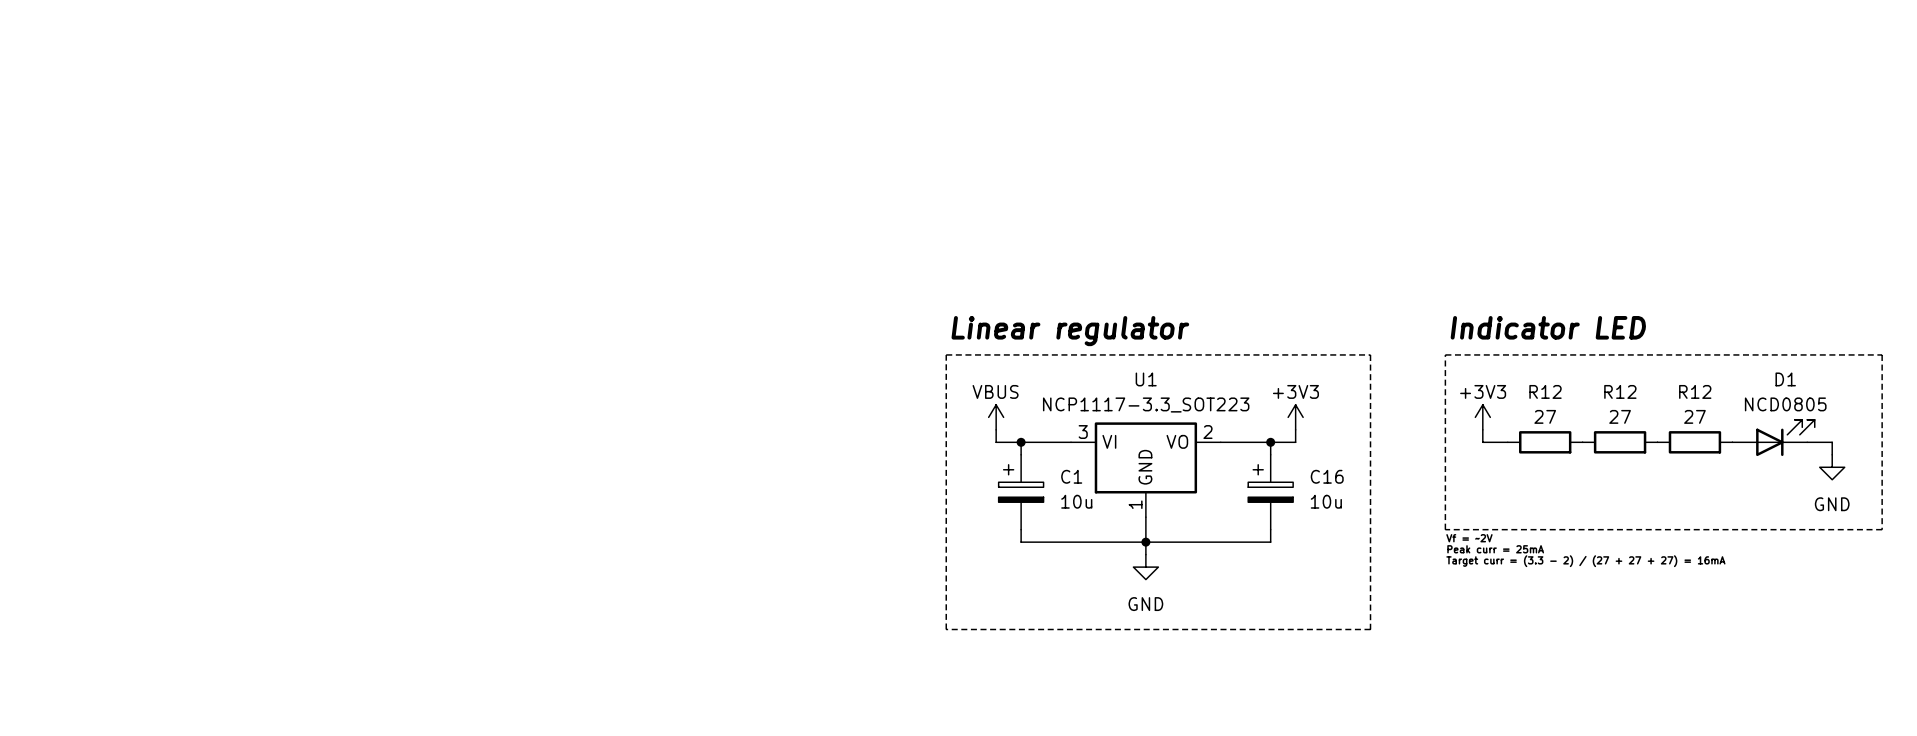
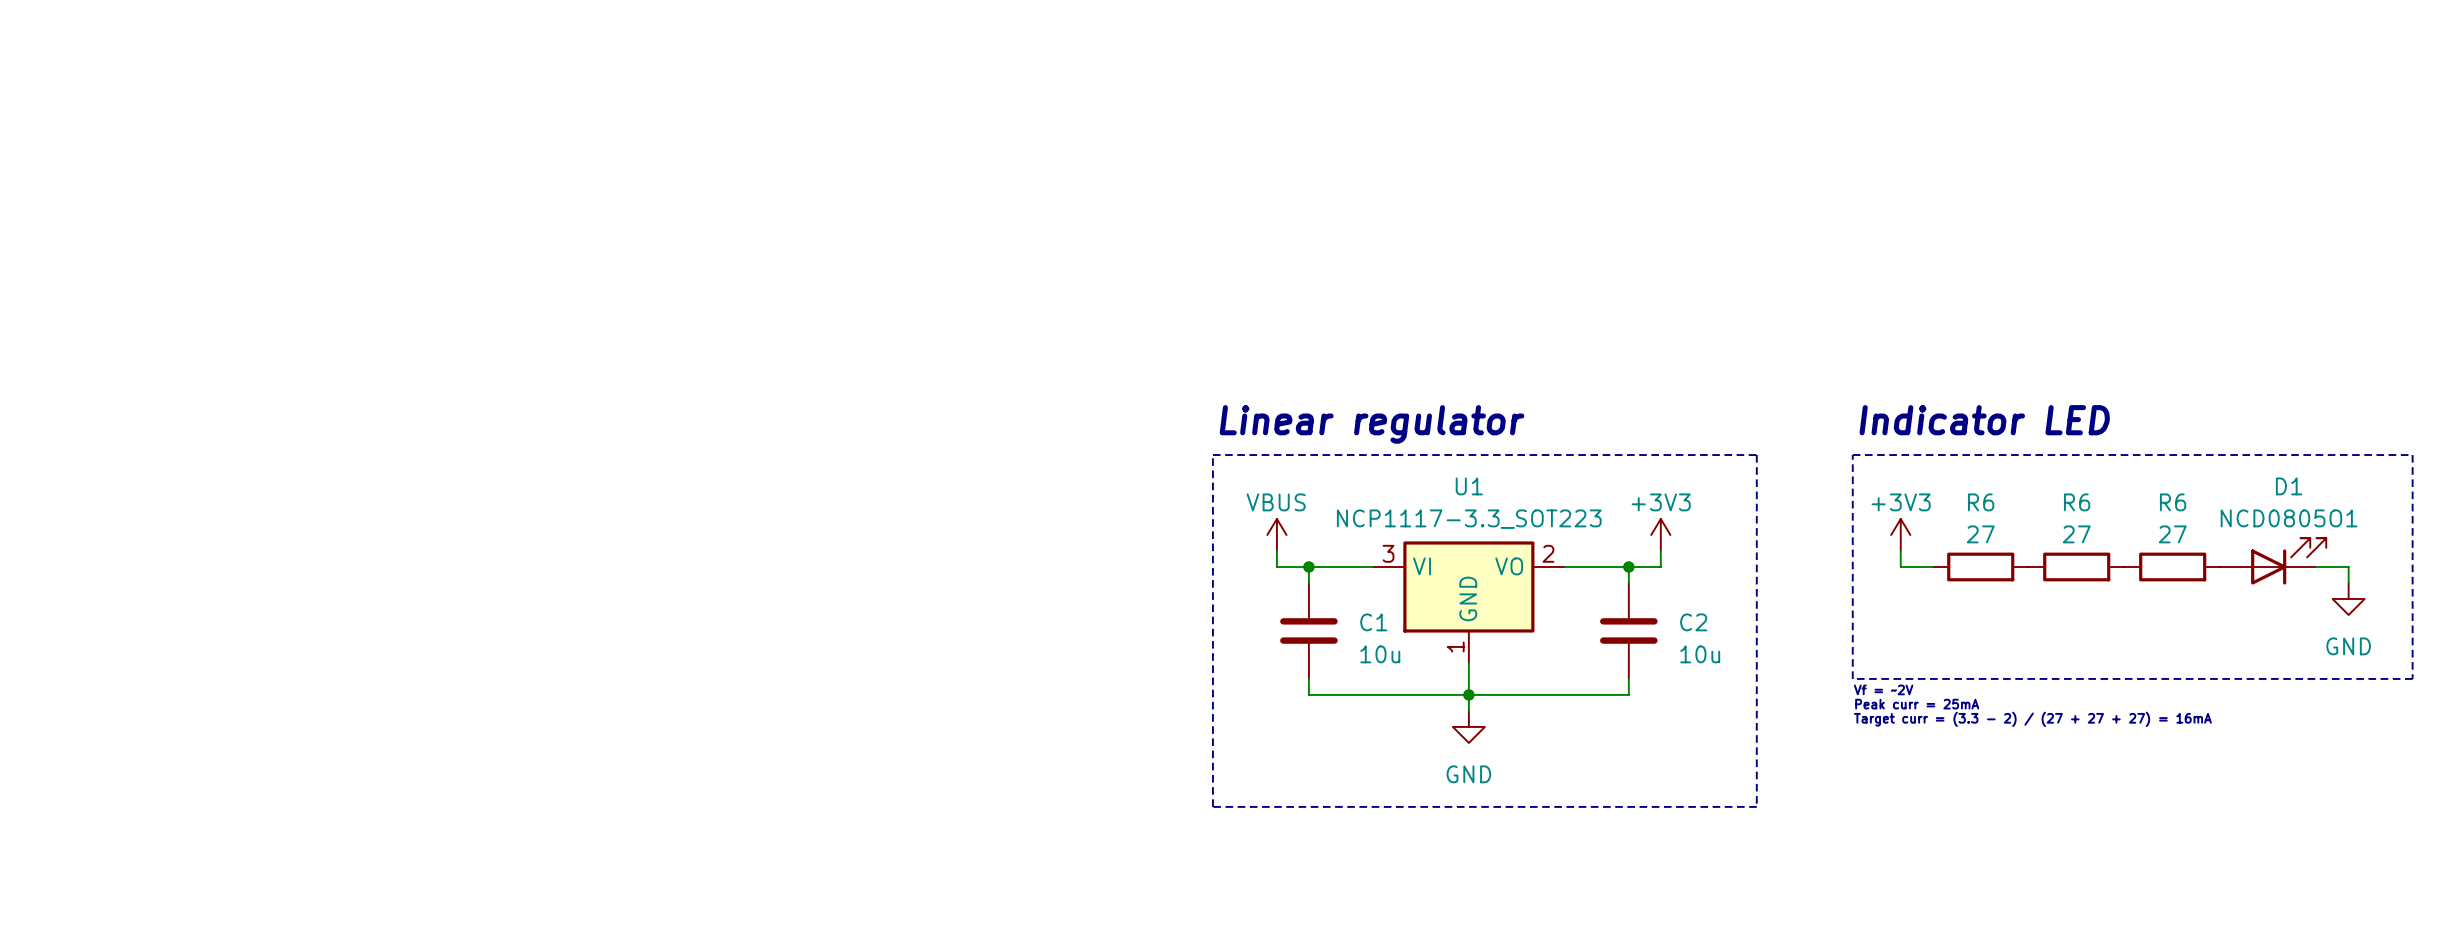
R12 name: R12 (1545, 391) -> R6 (1981, 502)
R12 name: R12 (1620, 391) -> R6 (2077, 502)
R12 name: R12 (1695, 391) -> R6 (2173, 502)
D1 value: NCD0805 (1785, 404) -> NCD0805O1 (2289, 518)
C1 symbol: [998, 454, 1044, 530] -> [1280, 582, 1338, 679]
C16: 10u (1270, 492) -> none
C2: none -> 10u (1628, 630)

